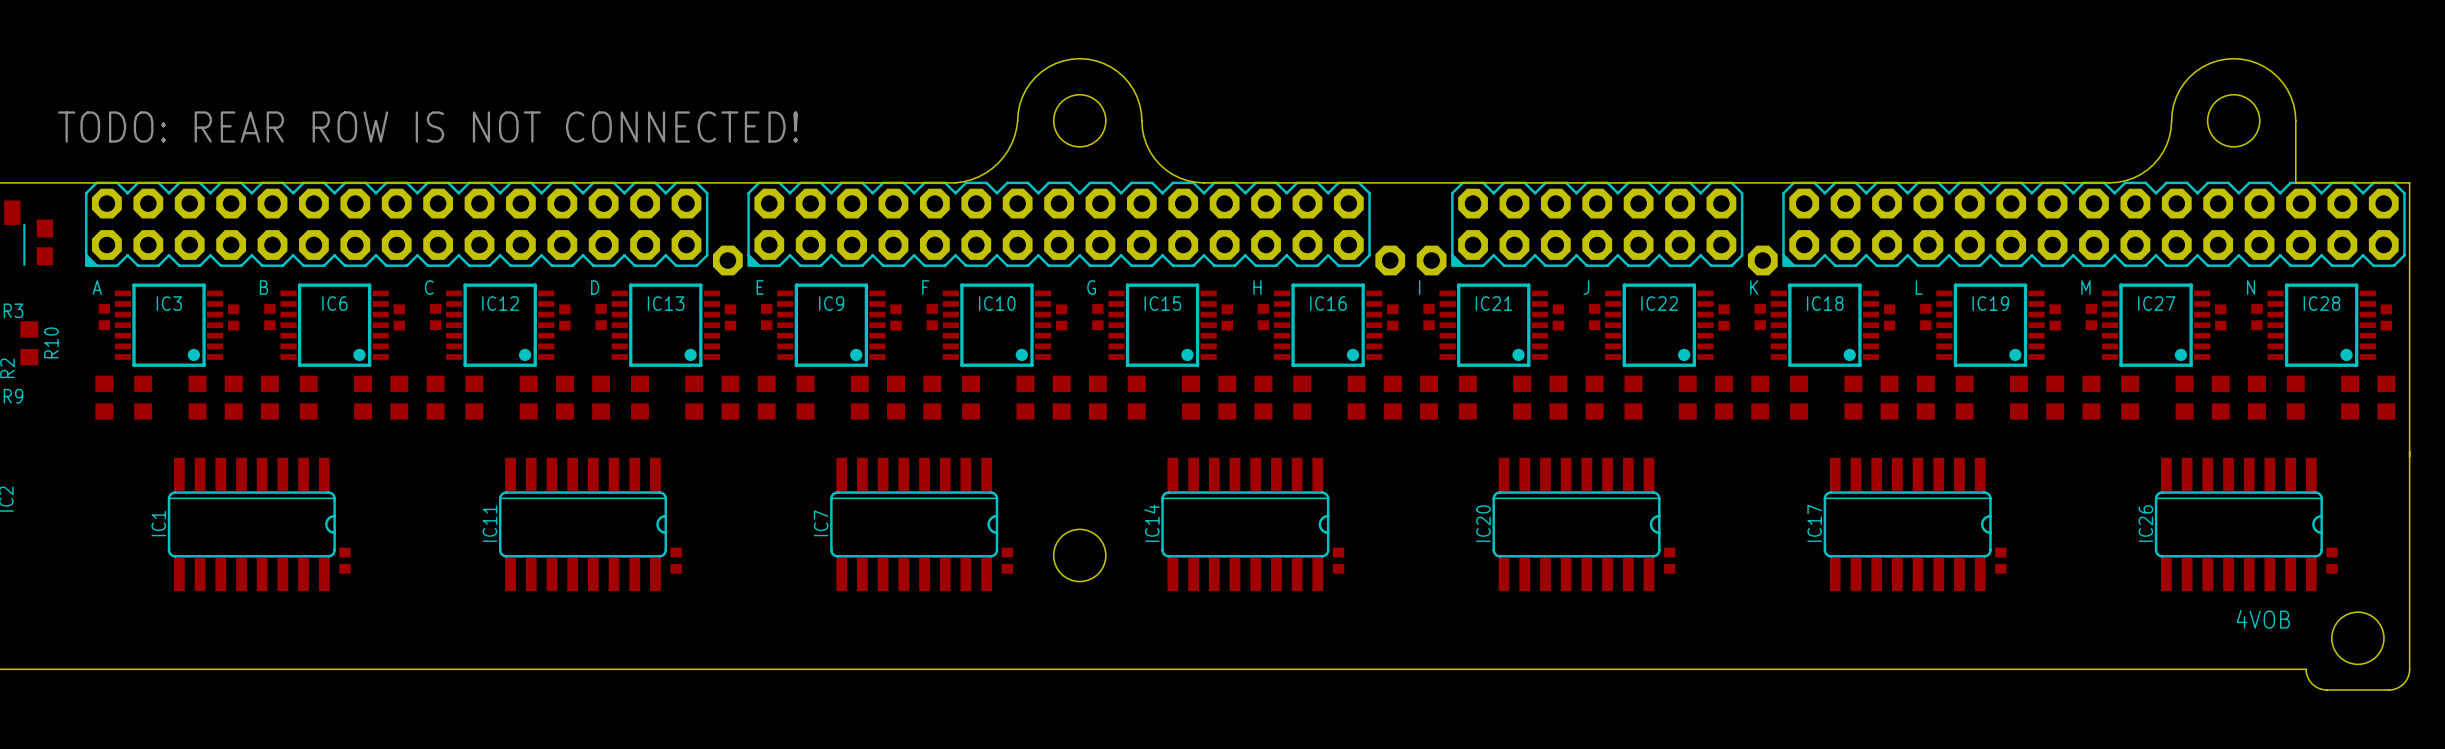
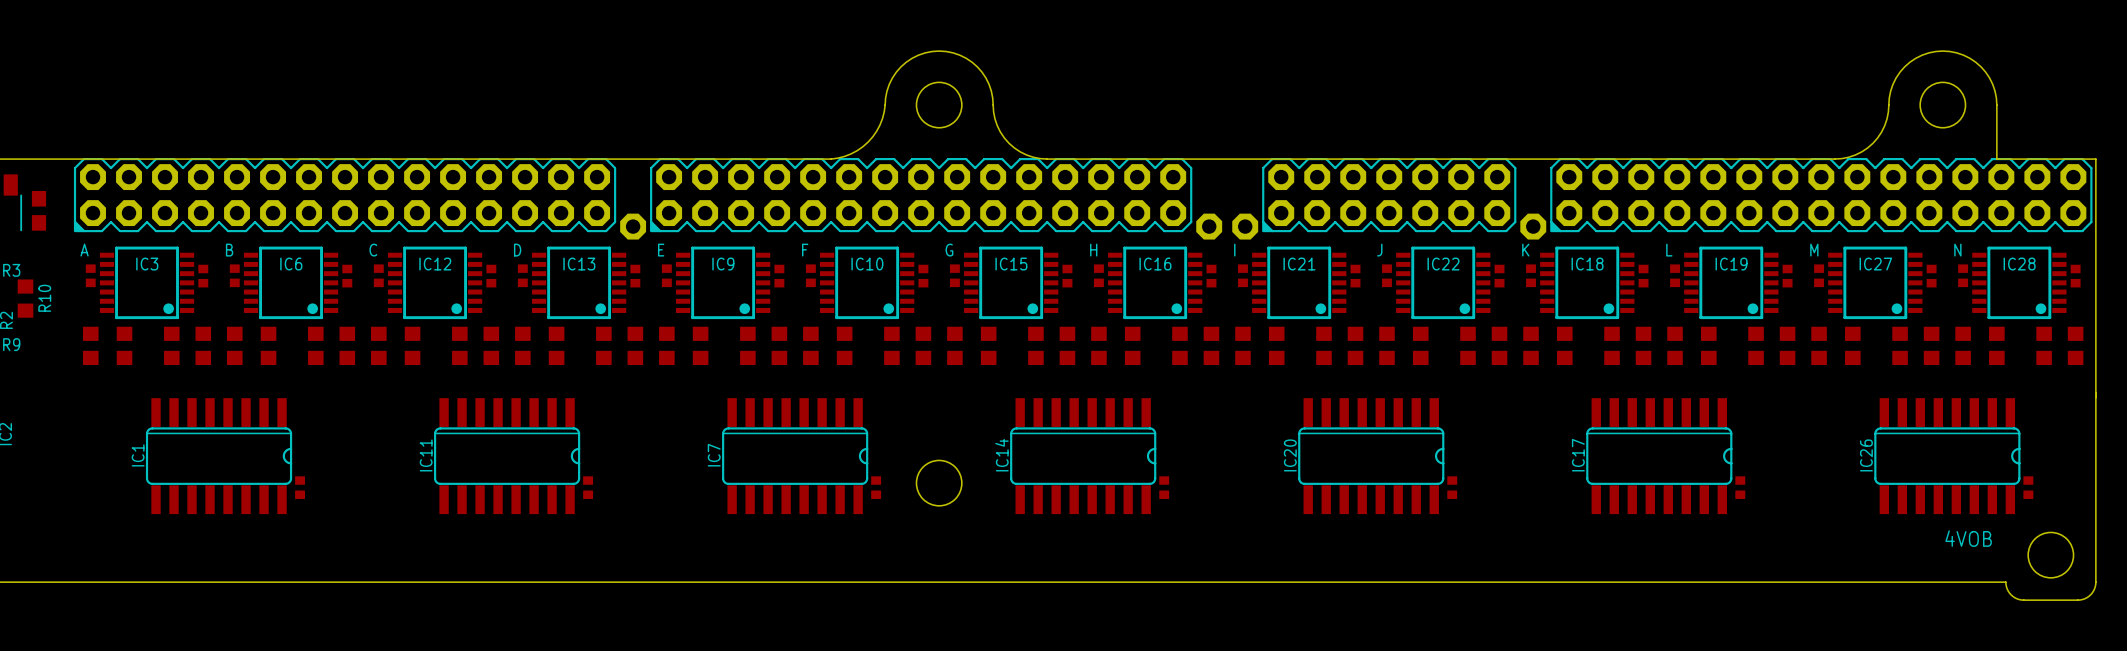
text: TODO: REAR ROW IS NOT CONNECTED! (428, 127) -> none

